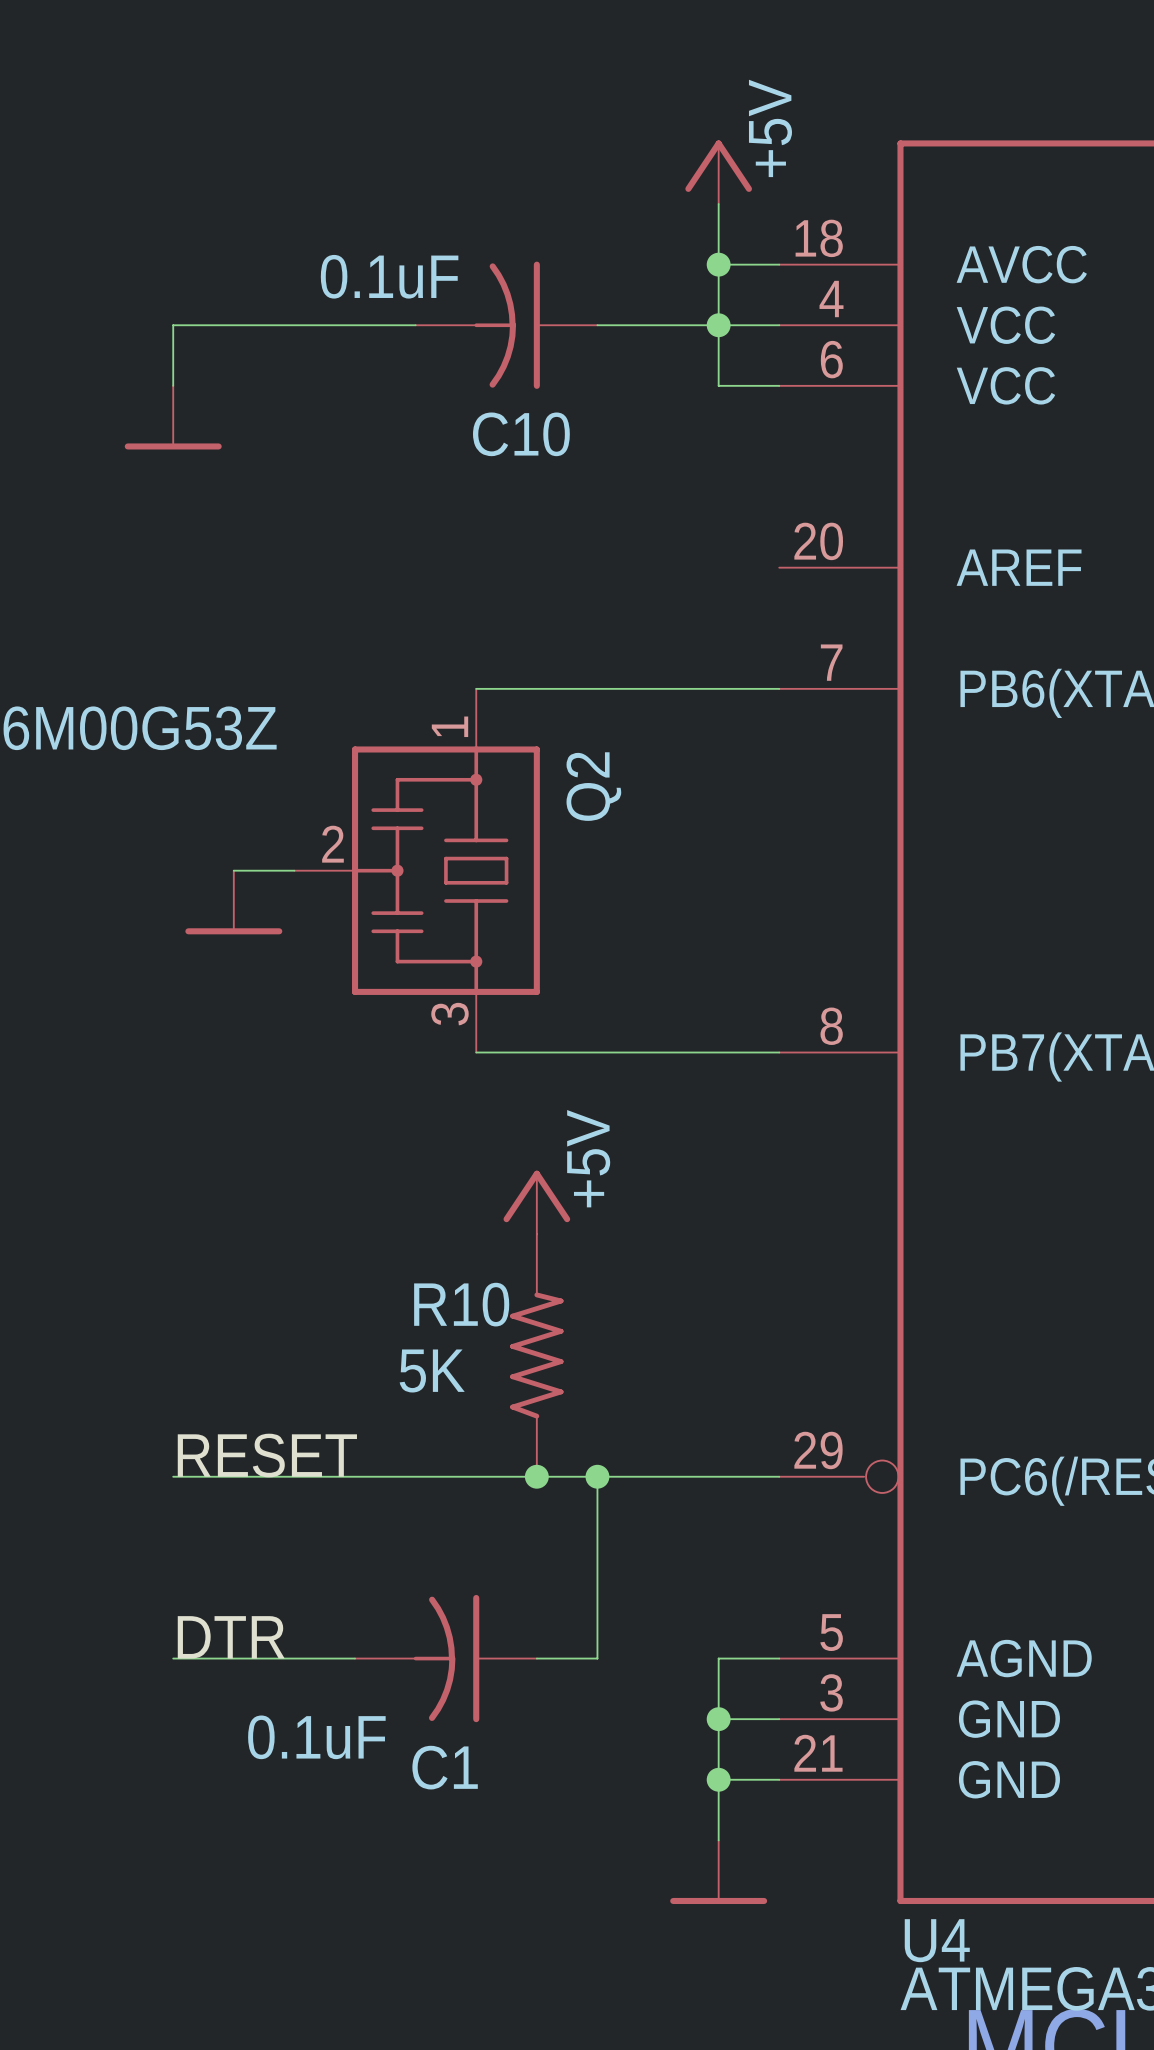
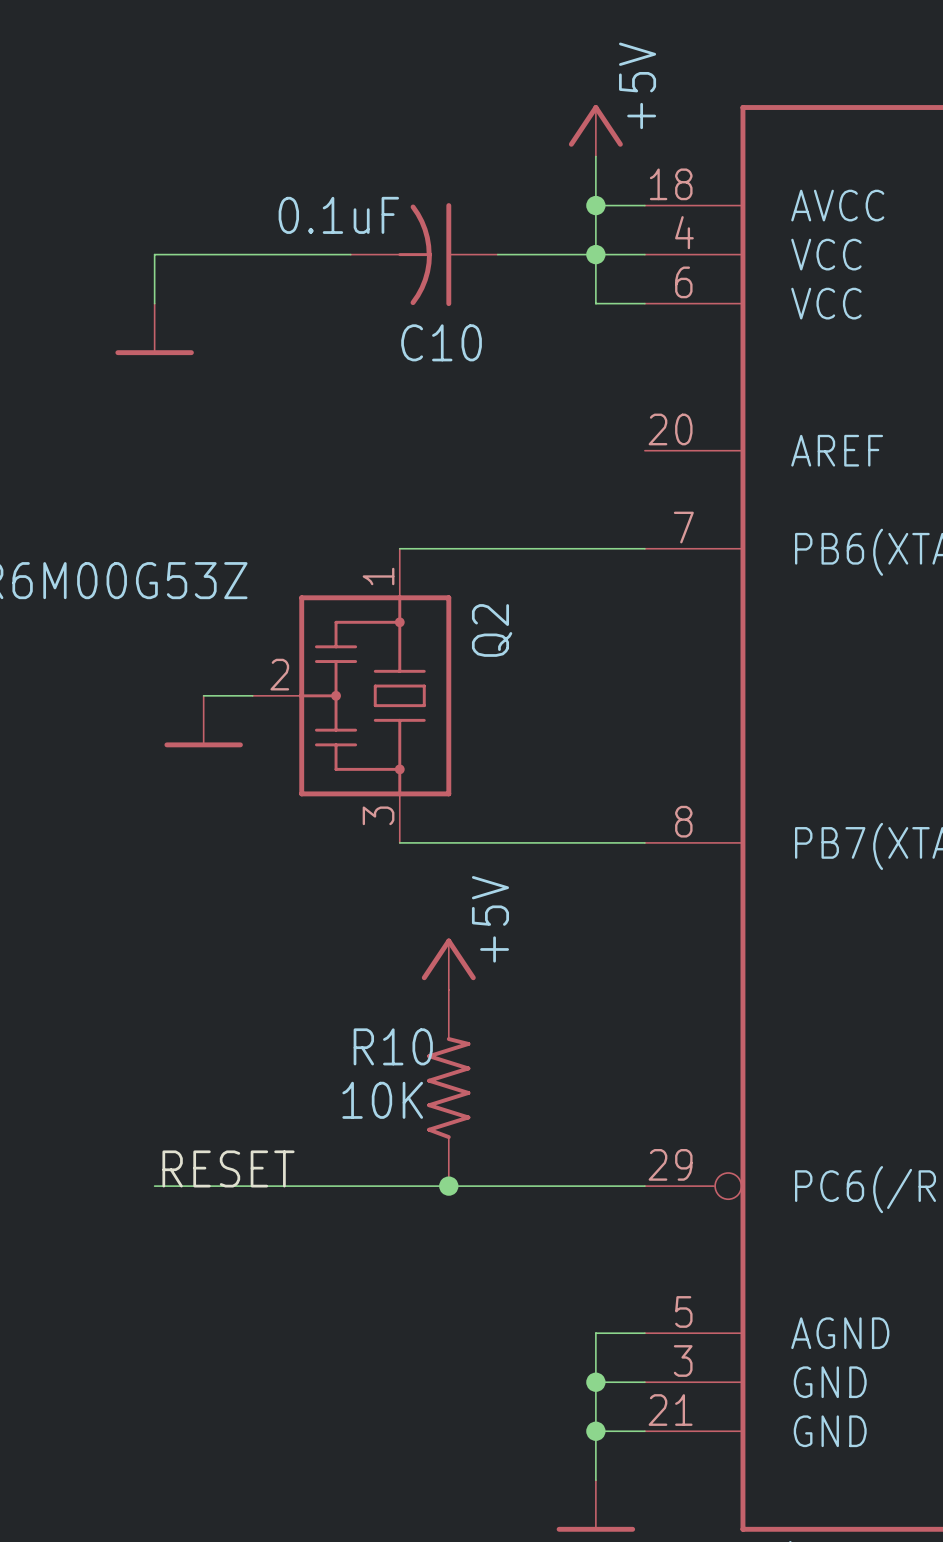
R10 value: 5K (432, 1370) -> 10K (382, 1100)
wire: (597, 1476) (597, 1658) (536, 1658) -> none
junction: (597, 1476) -> none
label: DTR (231, 1637) -> none
wire: (173, 1658) (355, 1658) -> none
C1: 0.1uF (445, 1658) -> none

